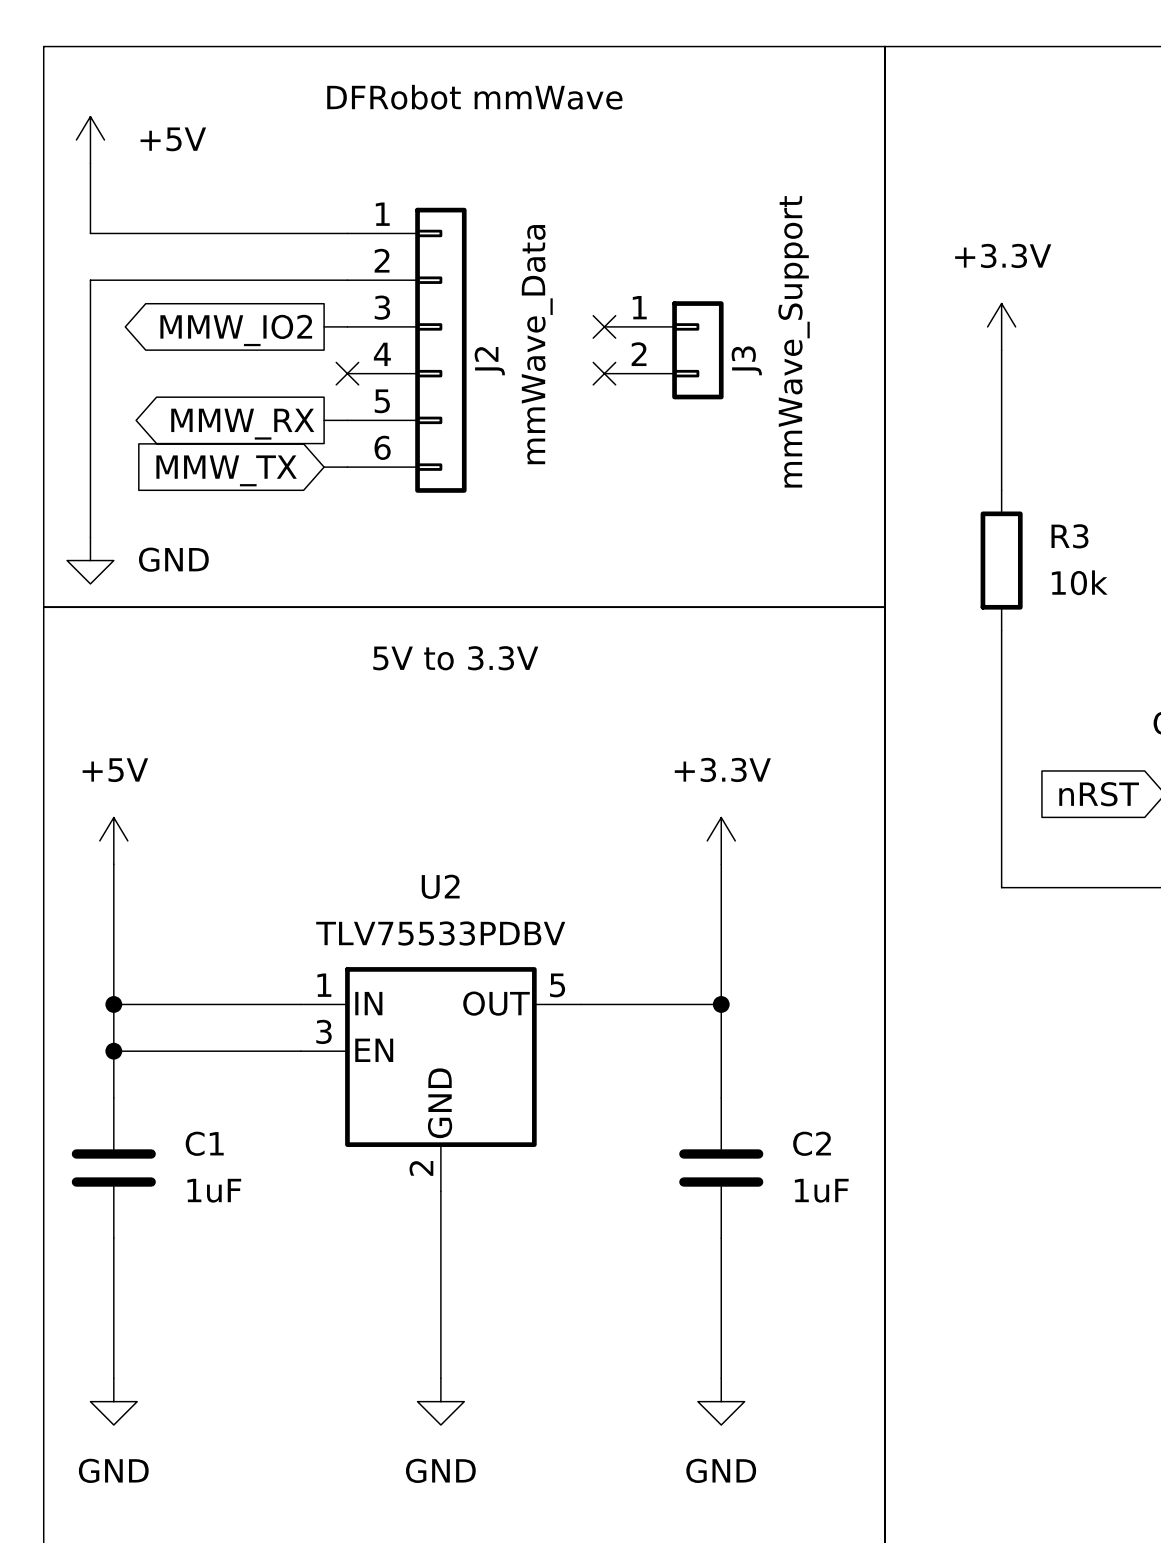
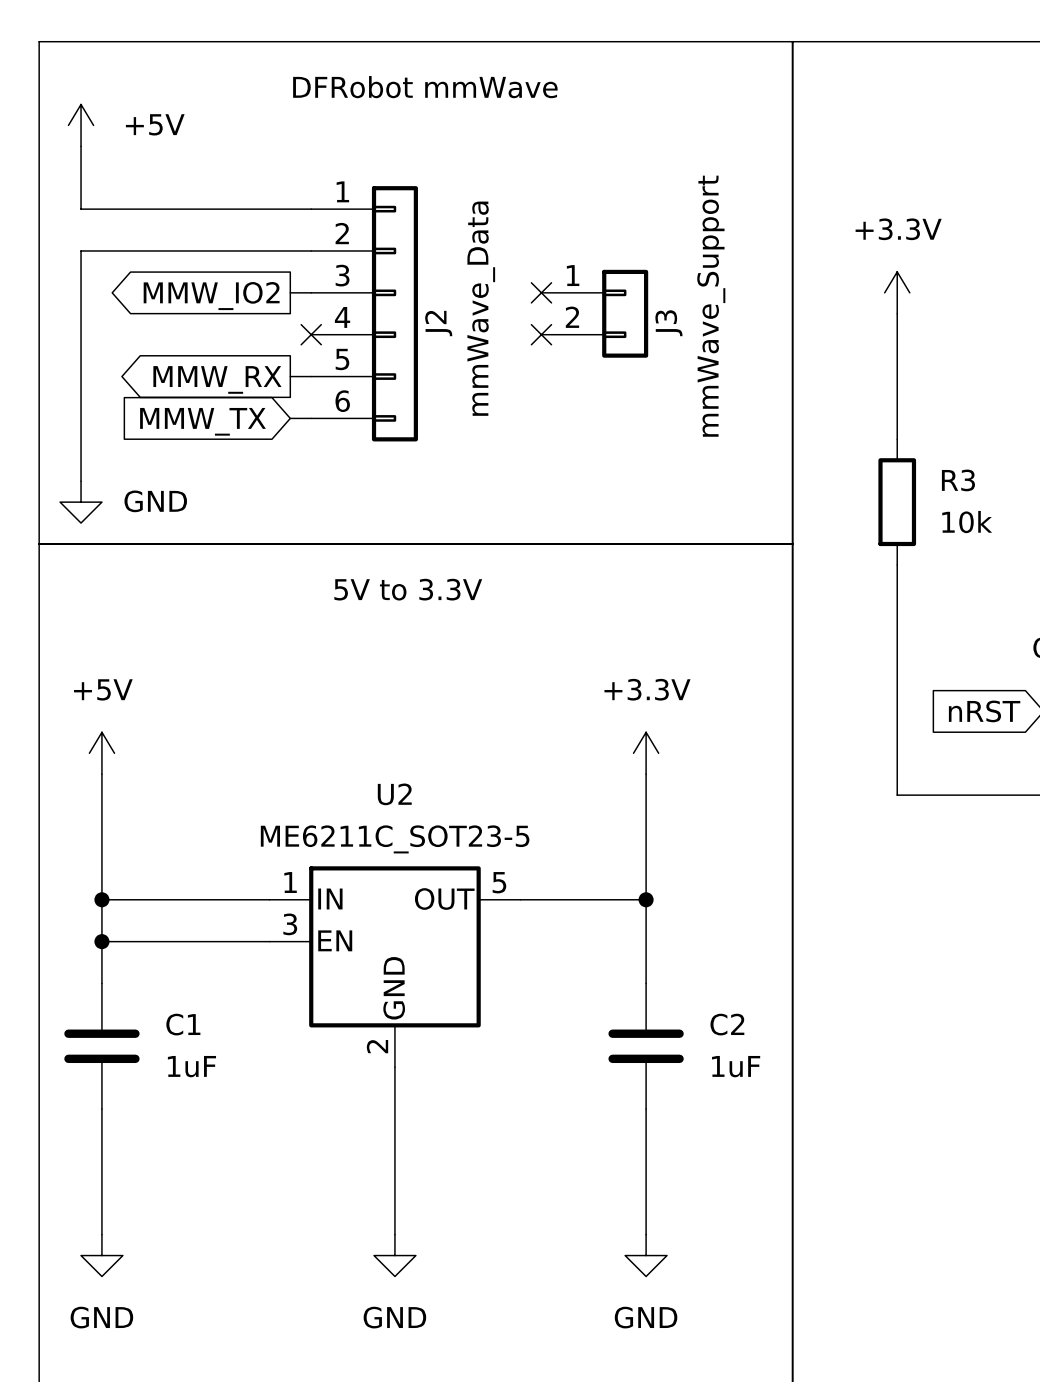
U2 value: TLV75533PDBV (440, 933) -> ME6211C_SOT23-5 (395, 839)

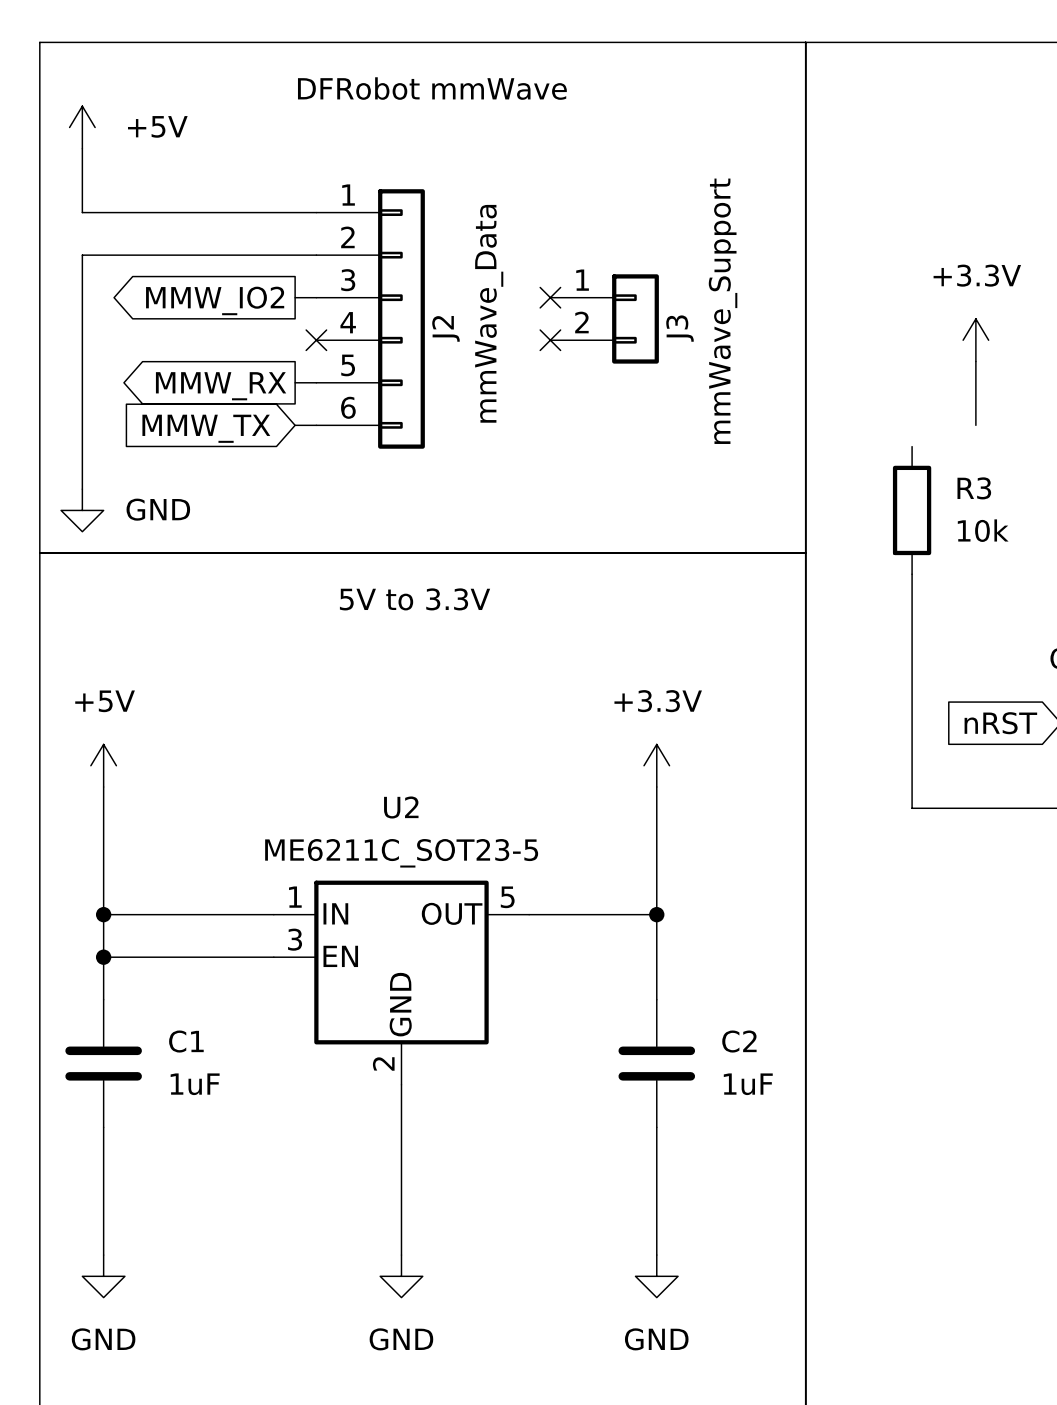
power symbol position: +3.3V (897, 292) -> +3.3V (975, 340)
wire: (897, 313) (897, 439) -> none
wire: none -> (975, 361) (975, 425)

